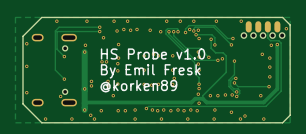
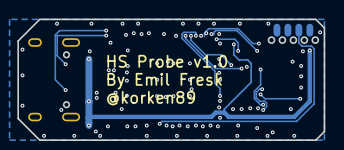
via: none -> (206, 33)
via: (189, 29) -> none
via: none -> (211, 34)
via: (193, 30) -> none
via: none -> (201, 35)
via: (185, 32) -> none

